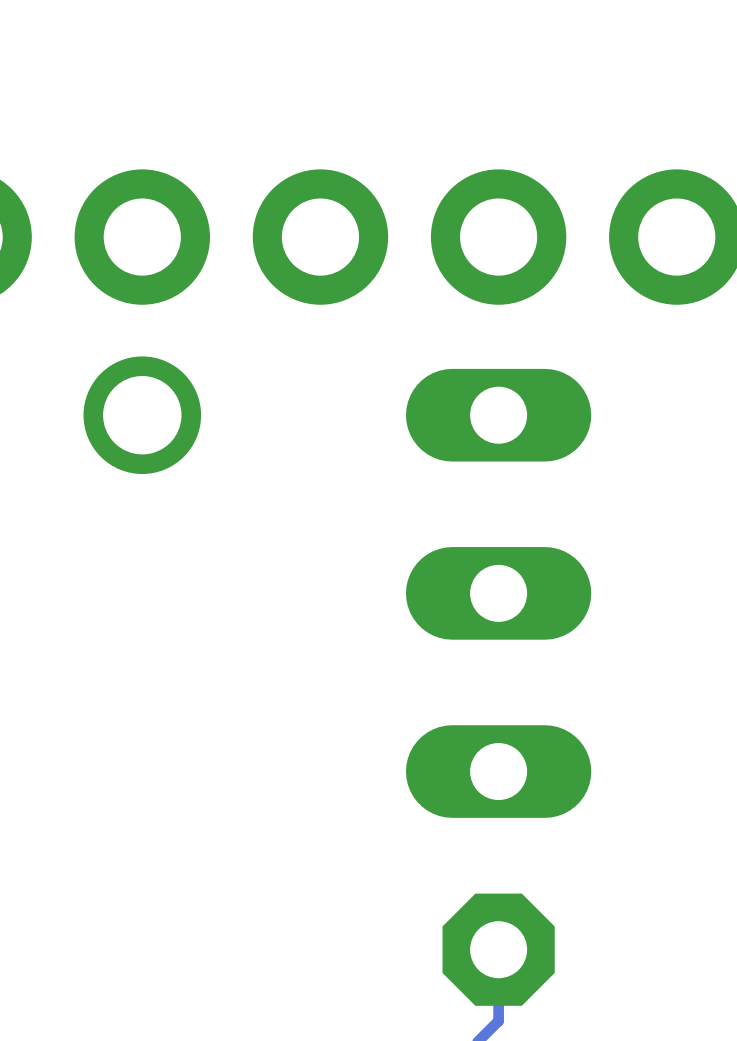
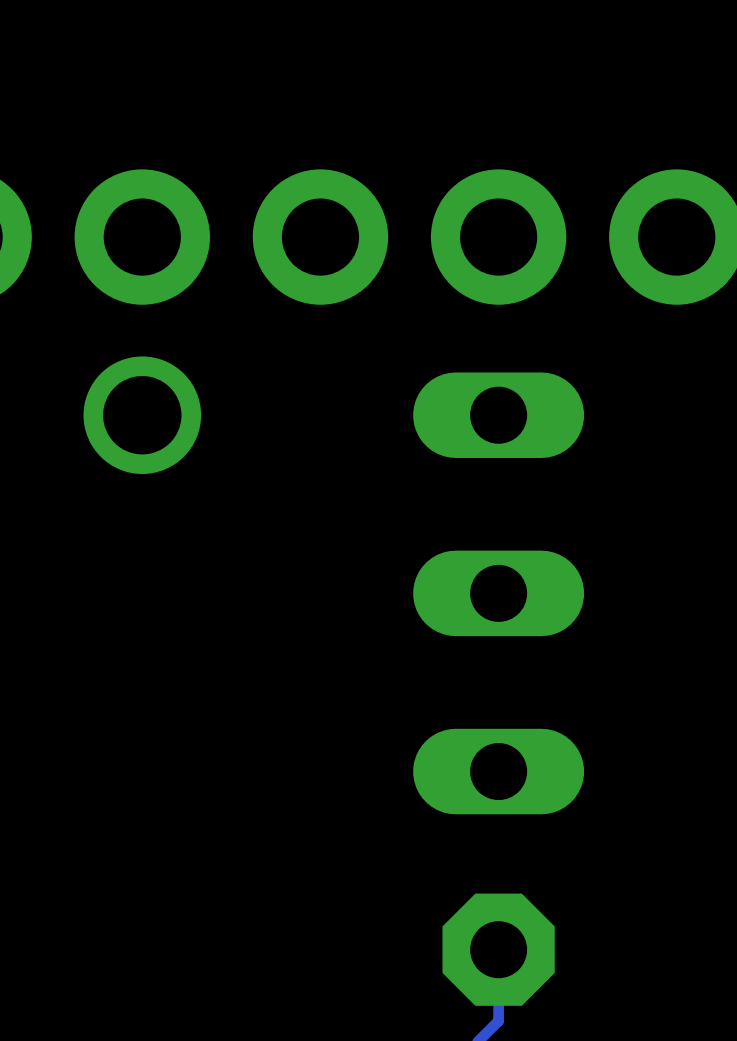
part footprint: [405, 368, 592, 818] -> [413, 372, 585, 815]

